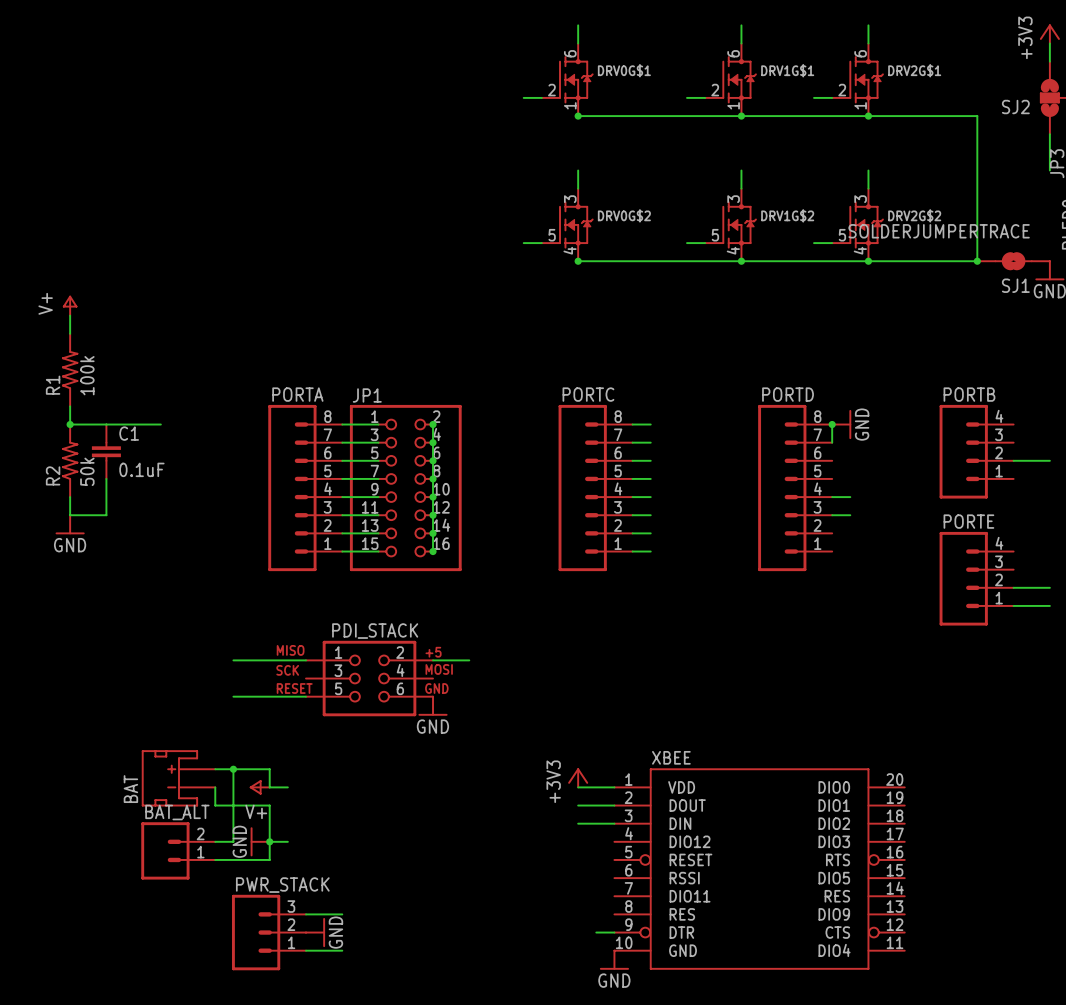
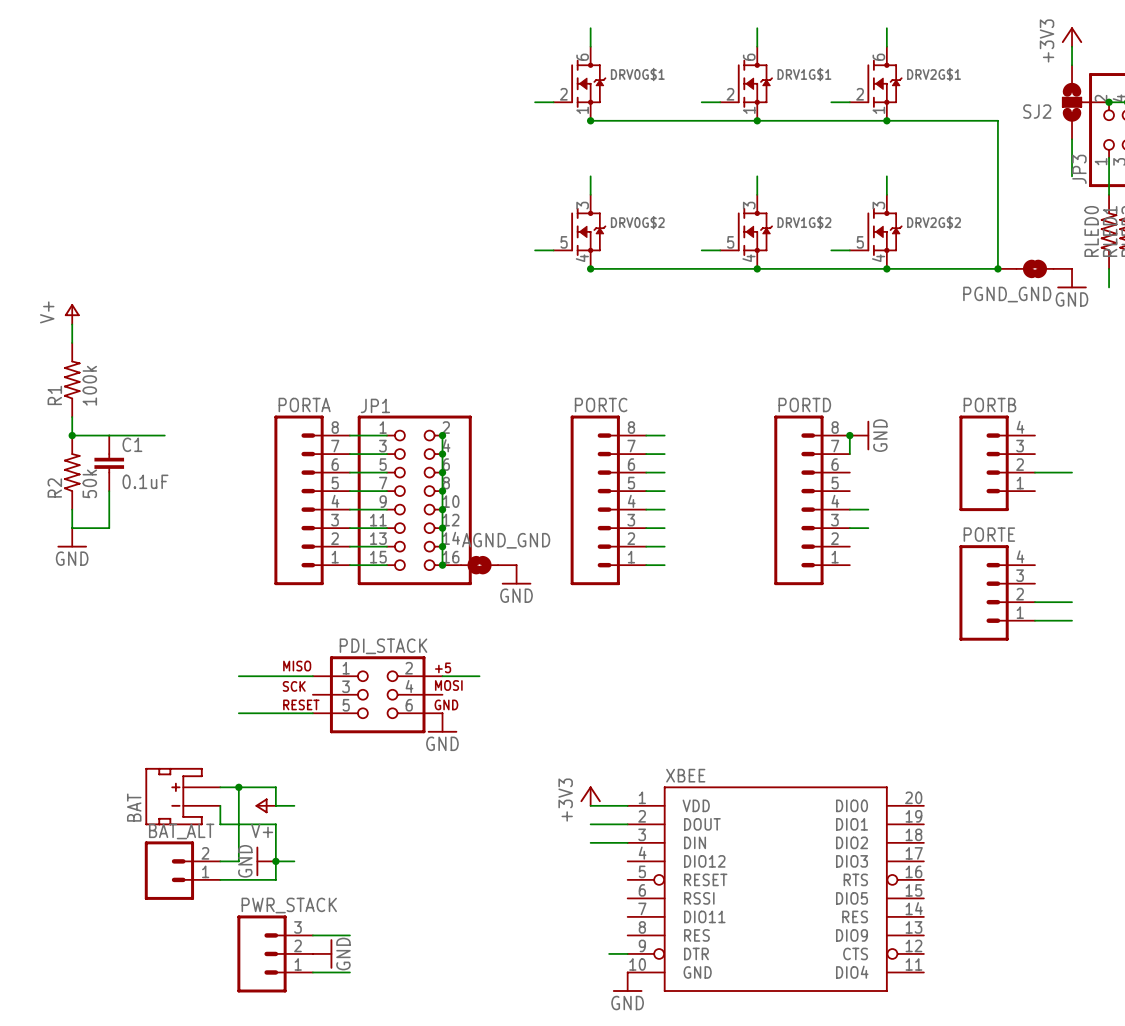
SJ1 value: SOLDERJUMPERTRACE (939, 231) -> none
SJ1 name: SJ1 (1015, 285) -> PGND_GND (1007, 294)
AGND_GND: none -> (479, 565)
power symbol: none -> GND (516, 574)

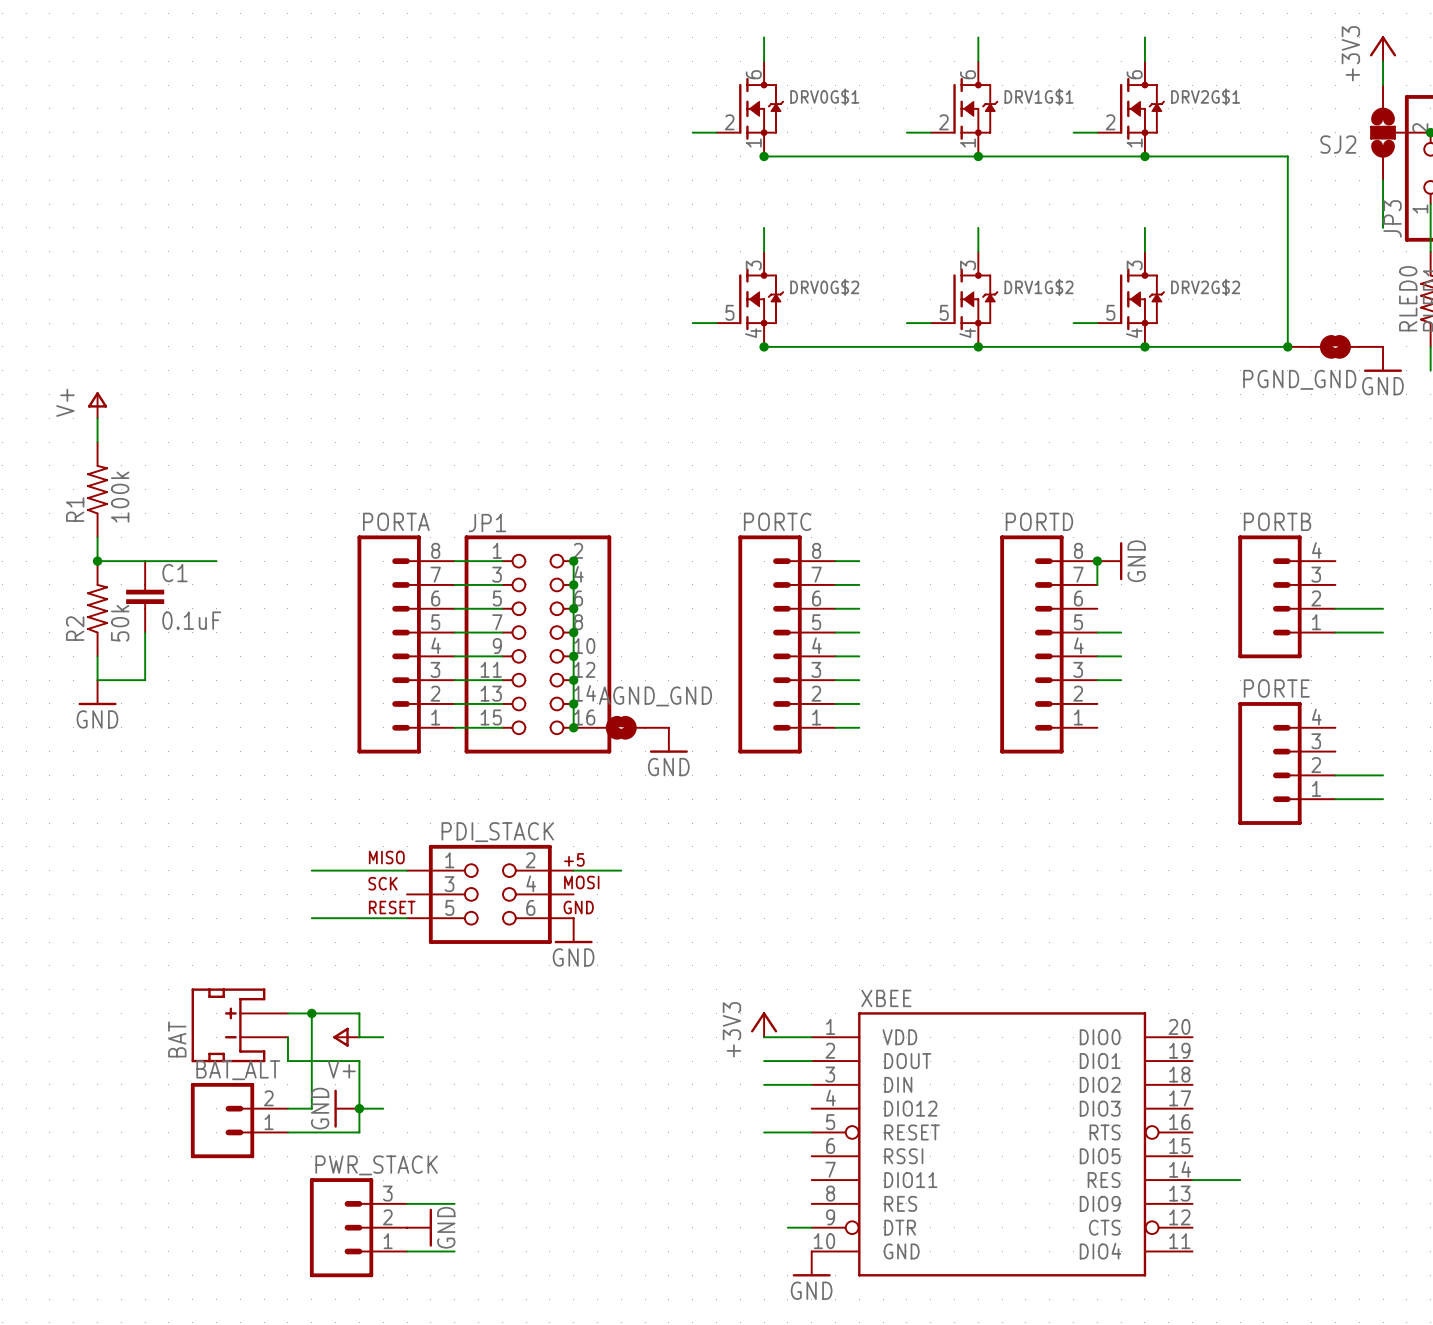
wire: none -> (1097, 632) (1121, 632)
wire: none -> (1335, 632) (1383, 632)
wire: none -> (764, 1132) (811, 1132)
wire: none -> (1192, 1180) (1240, 1180)

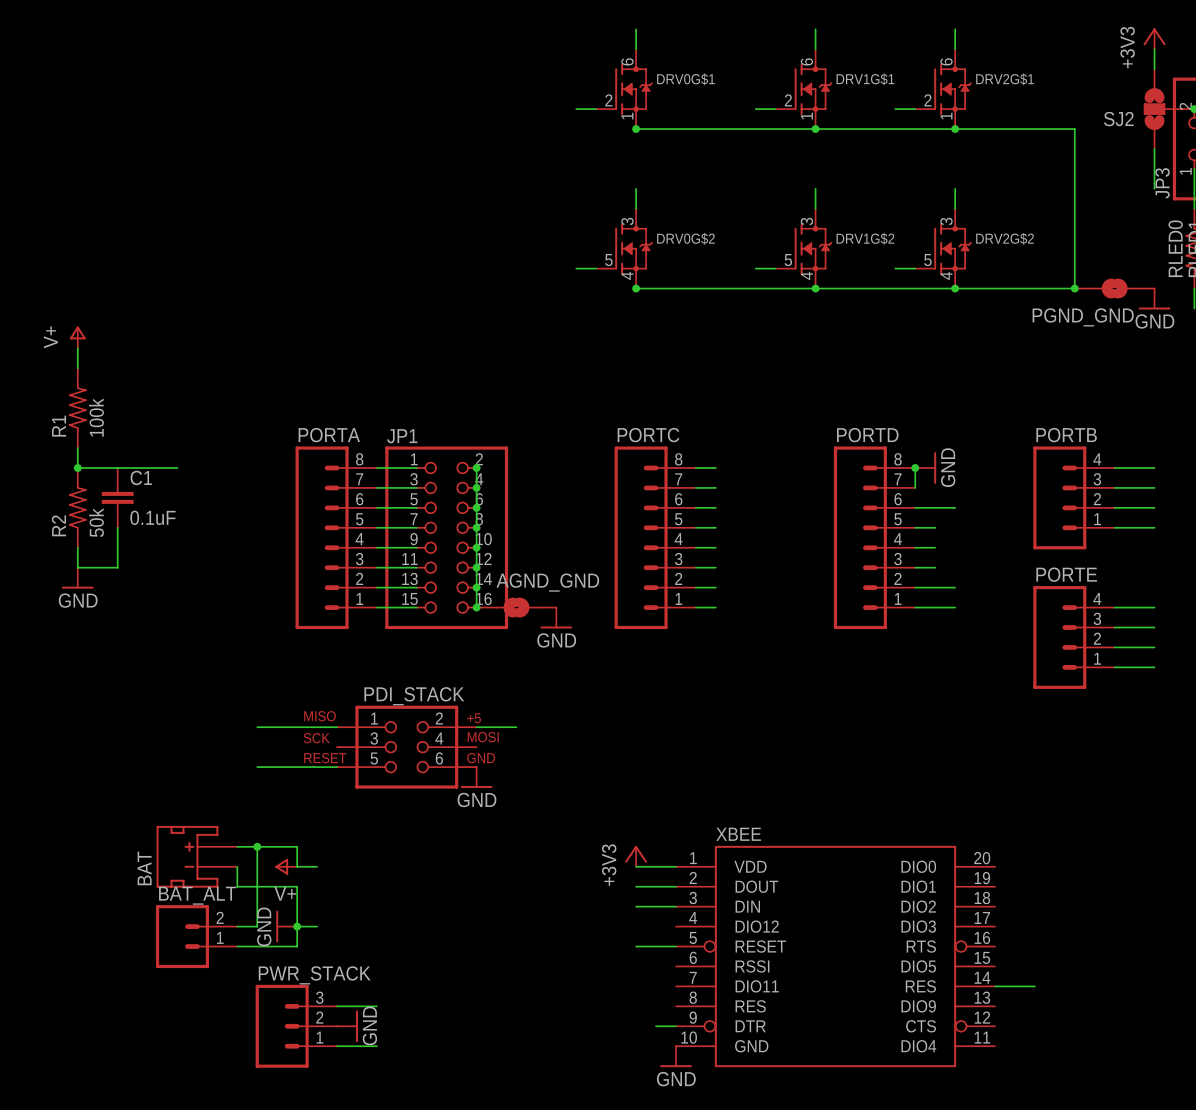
wire: none -> (1114, 468) (1154, 468)
wire: none -> (1114, 487) (1154, 487)
wire: none -> (915, 507) (955, 507)
wire: none -> (915, 587) (955, 587)
wire: none -> (915, 607) (955, 607)
wire: none -> (1114, 607) (1154, 607)
wire: none -> (1114, 627) (1154, 627)

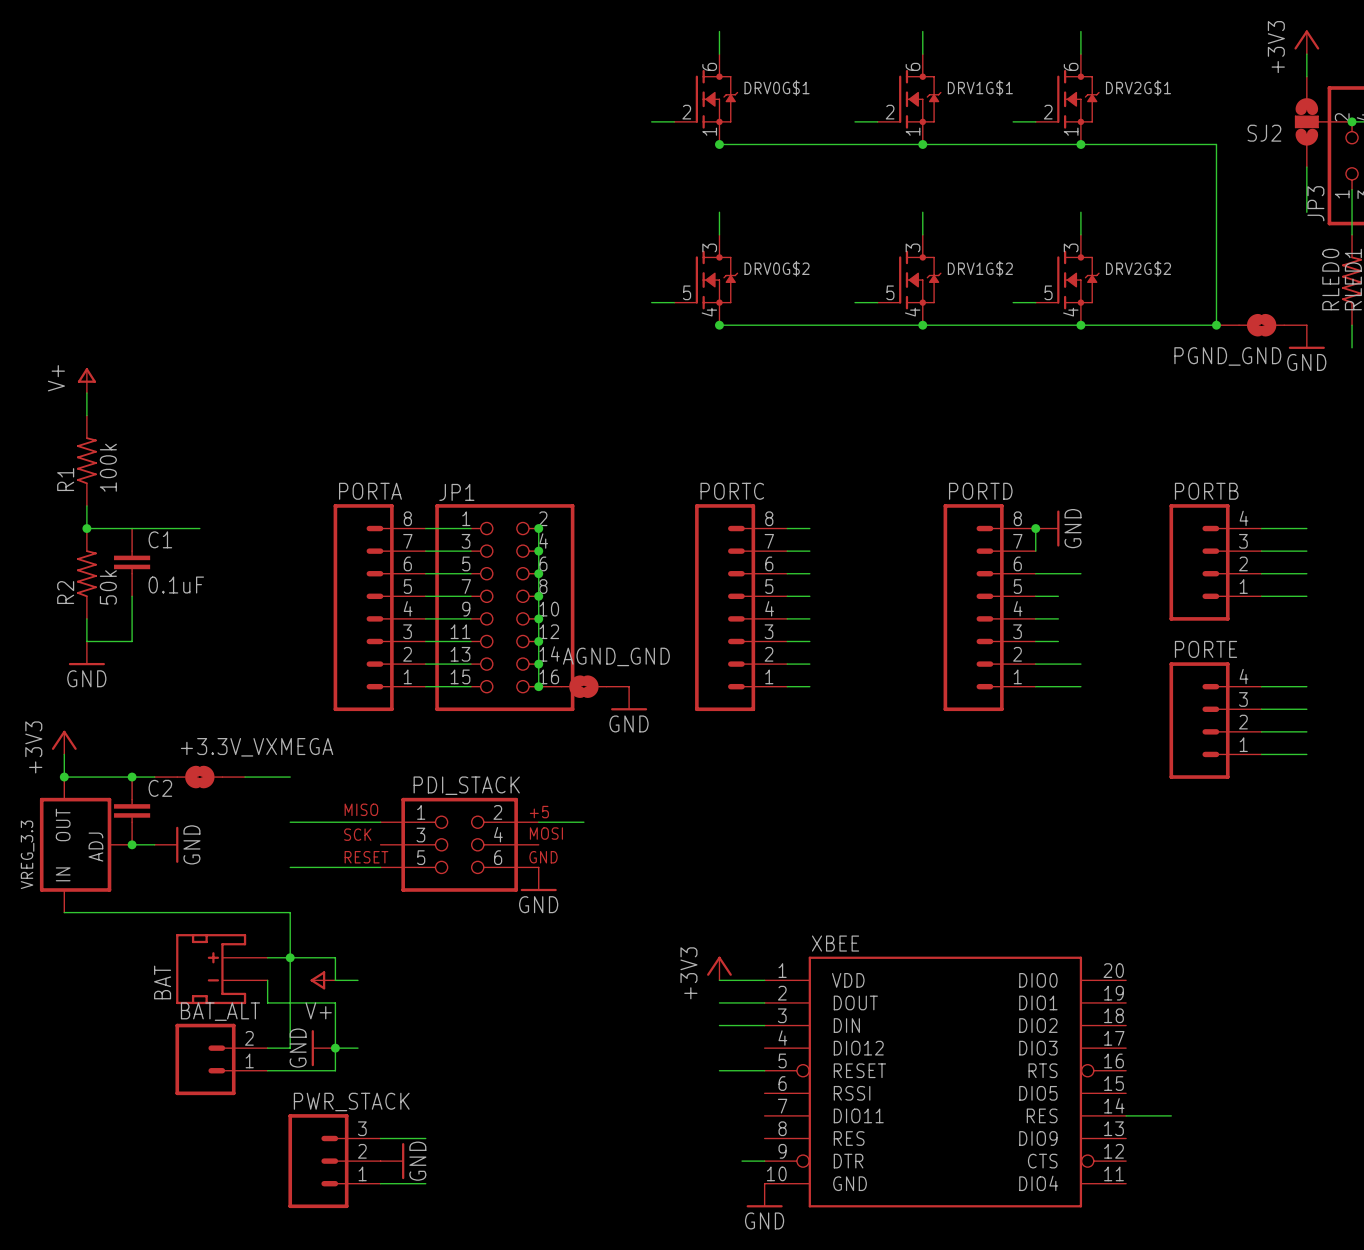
power symbol: none -> +3V3 (64, 742)
wire: none -> (64, 754) (64, 777) (154, 777)
junction: none -> (64, 777)
junction: none -> (132, 777)
+3.3V_VXMEGA: none -> (199, 777)
wire: none -> (245, 777) (290, 777)
C2: none -> (132, 810)
VREG_3.3: none -> (85, 844)
wire: none -> (132, 844) (154, 844)
junction: none -> (132, 844)
power symbol: none -> GND (166, 844)
wire: none -> (64, 912) (290, 912) (290, 957)

